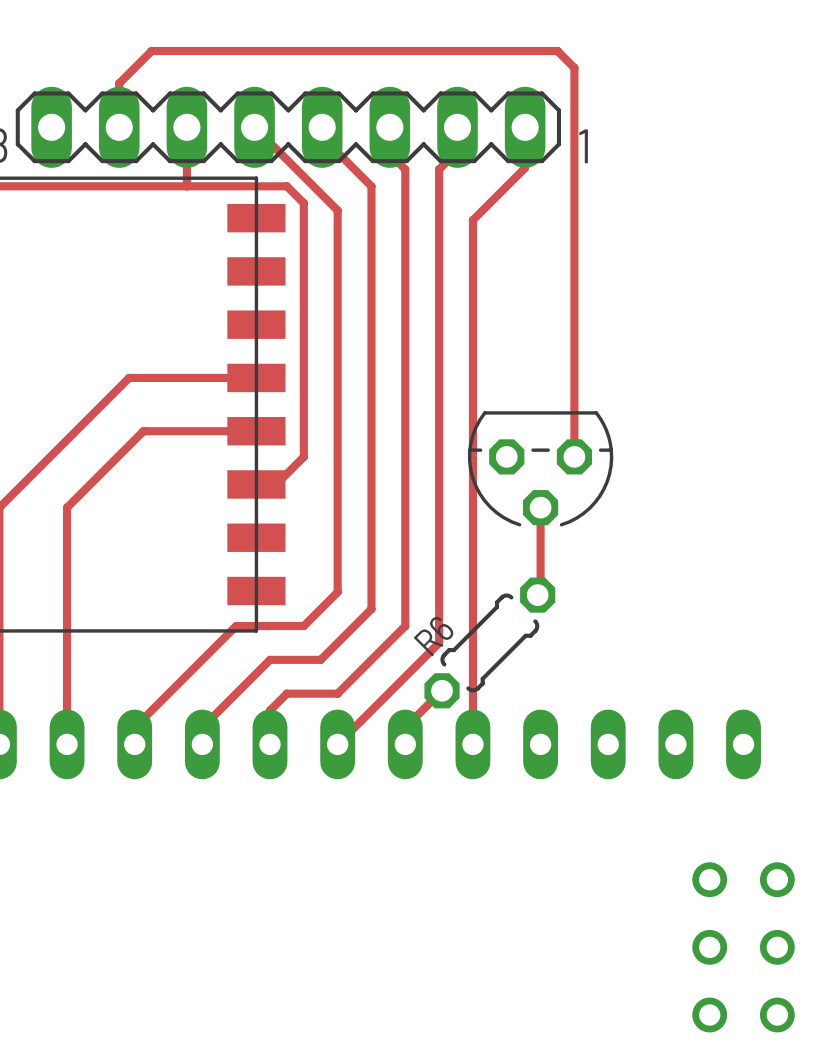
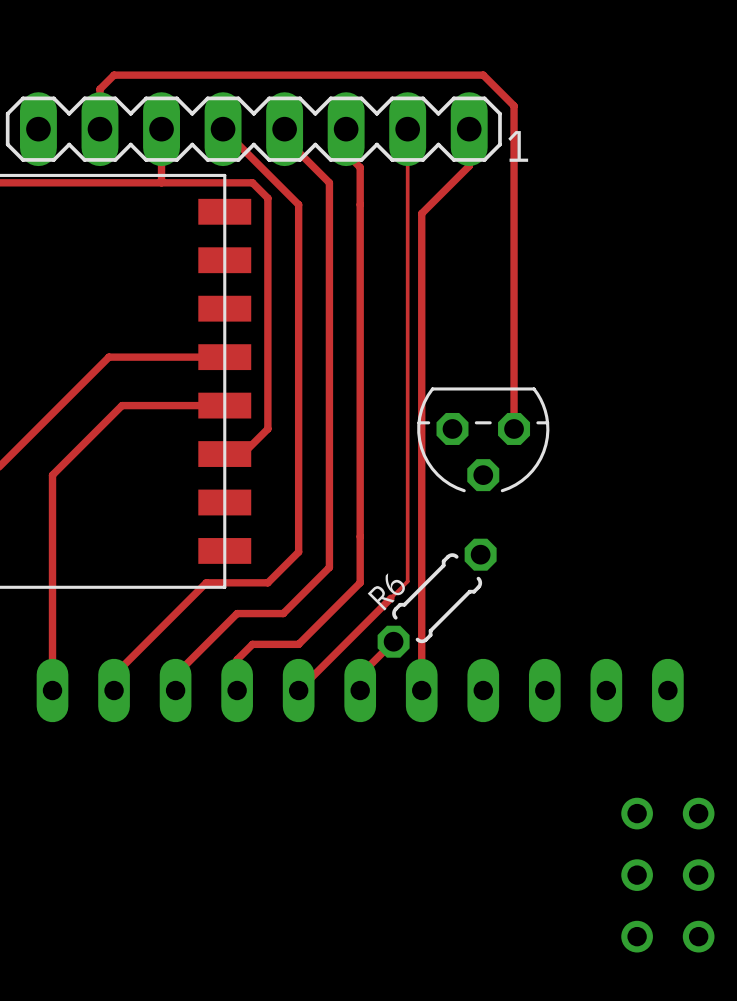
top track: (134, 67) (151, 51) (557, 51) (574, 67) (574, 101) -> (114, 75) (483, 75) (514, 105)
top track: (457, 151) (439, 169) (439, 642) -> (407, 150) (407, 581) (390, 598)
top track: (540, 507) (540, 592) (537, 595) -> none

